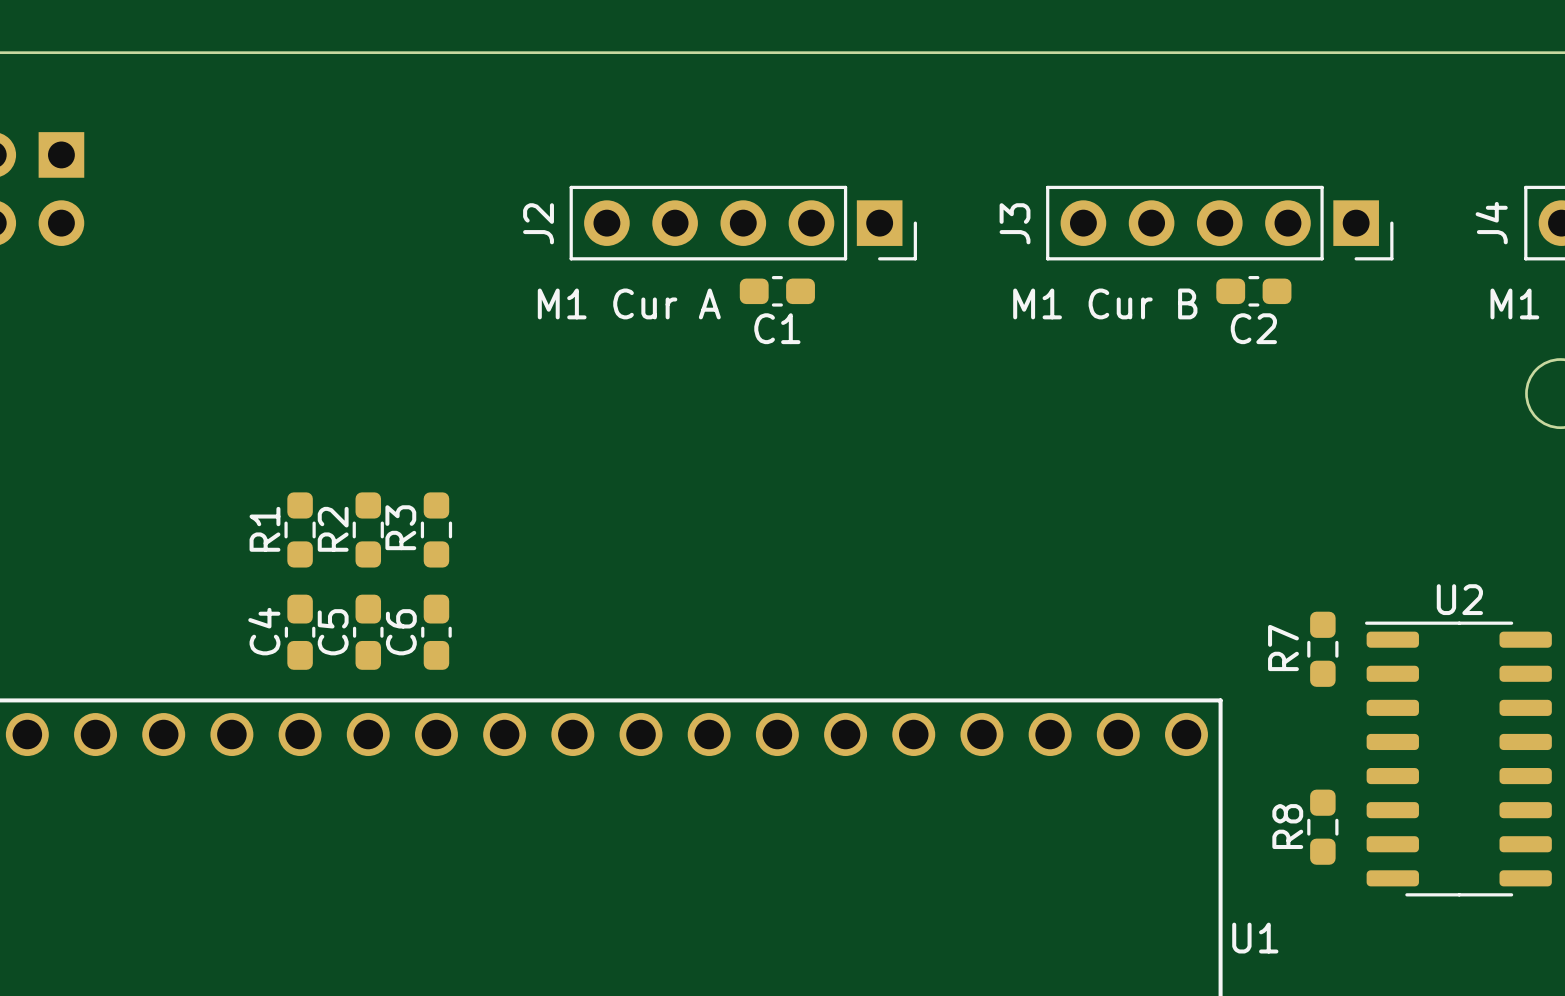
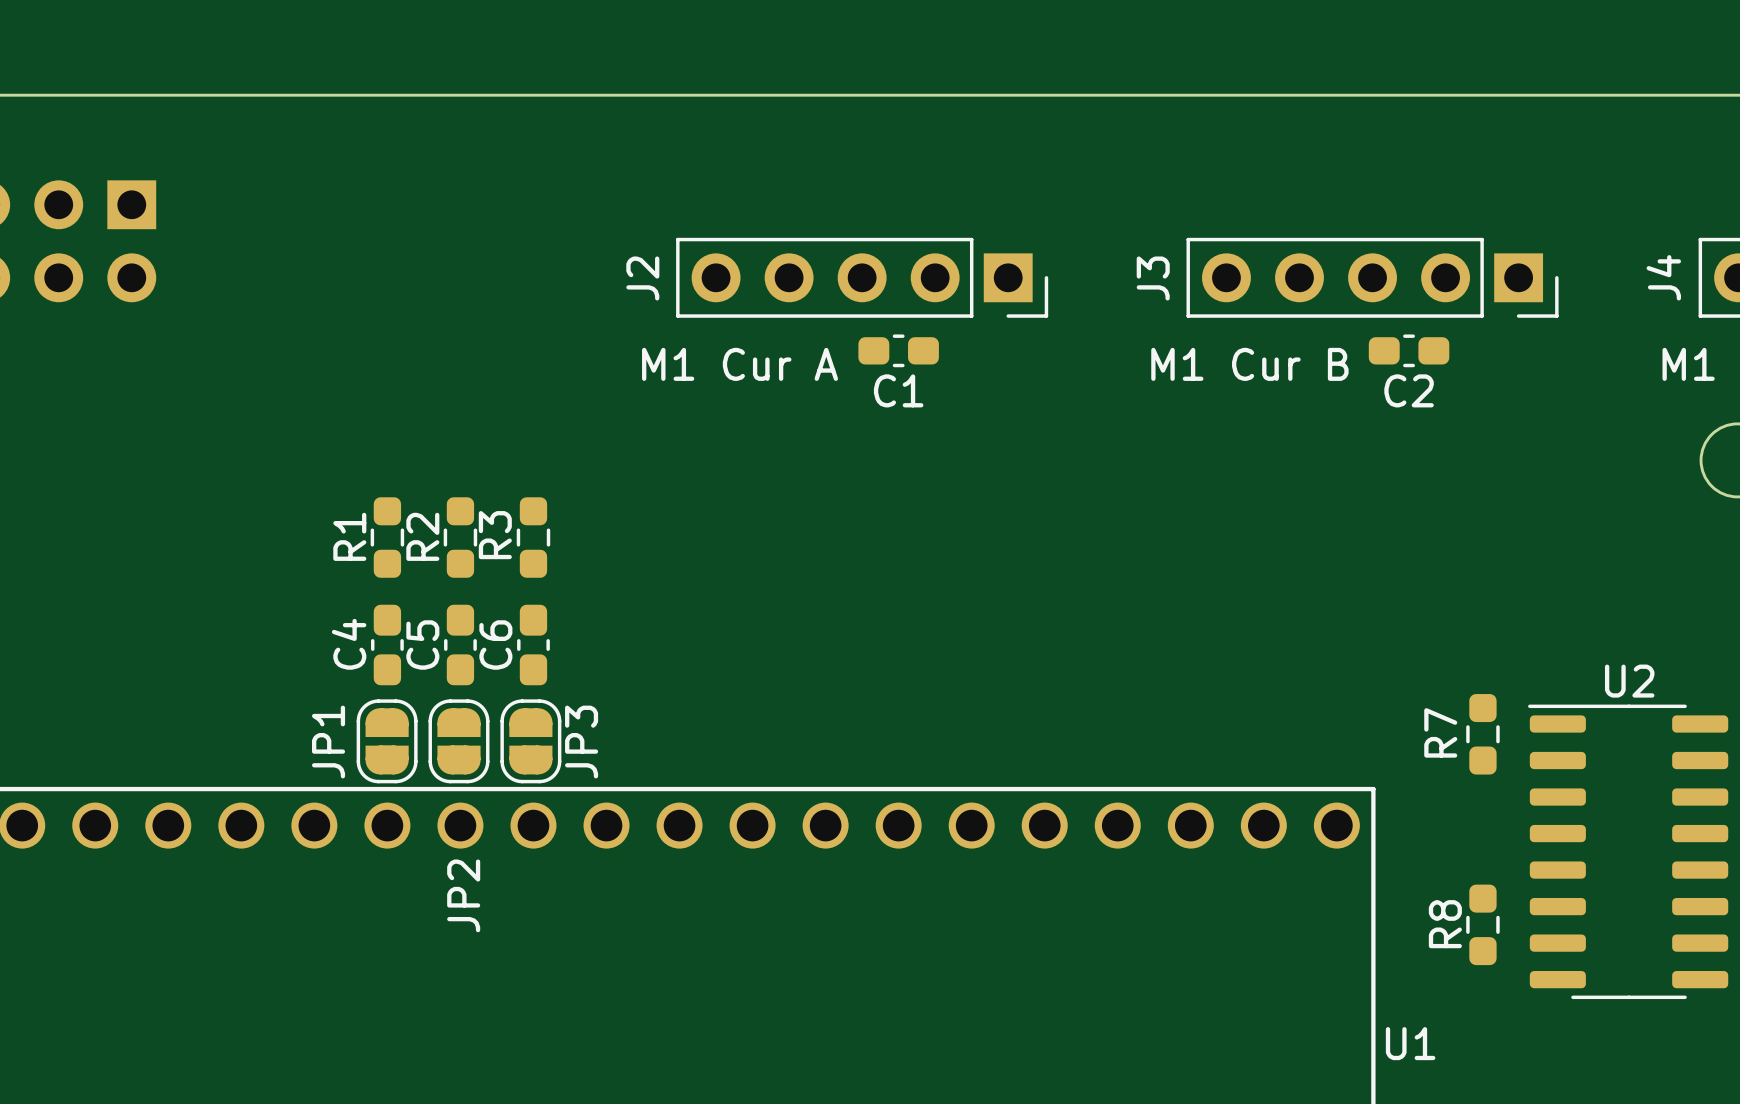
R1 position: (300, 529) -> (387, 537)
R2 position: (368, 529) -> (460, 537)
R3 position: (436, 529) -> (533, 537)
C4 position: (300, 632) -> (387, 645)
C5 position: (368, 632) -> (460, 645)
C6 position: (436, 632) -> (533, 645)
JP1: none -> (387, 741)
JP2: none -> (459, 741)
JP3: none -> (530, 741)

